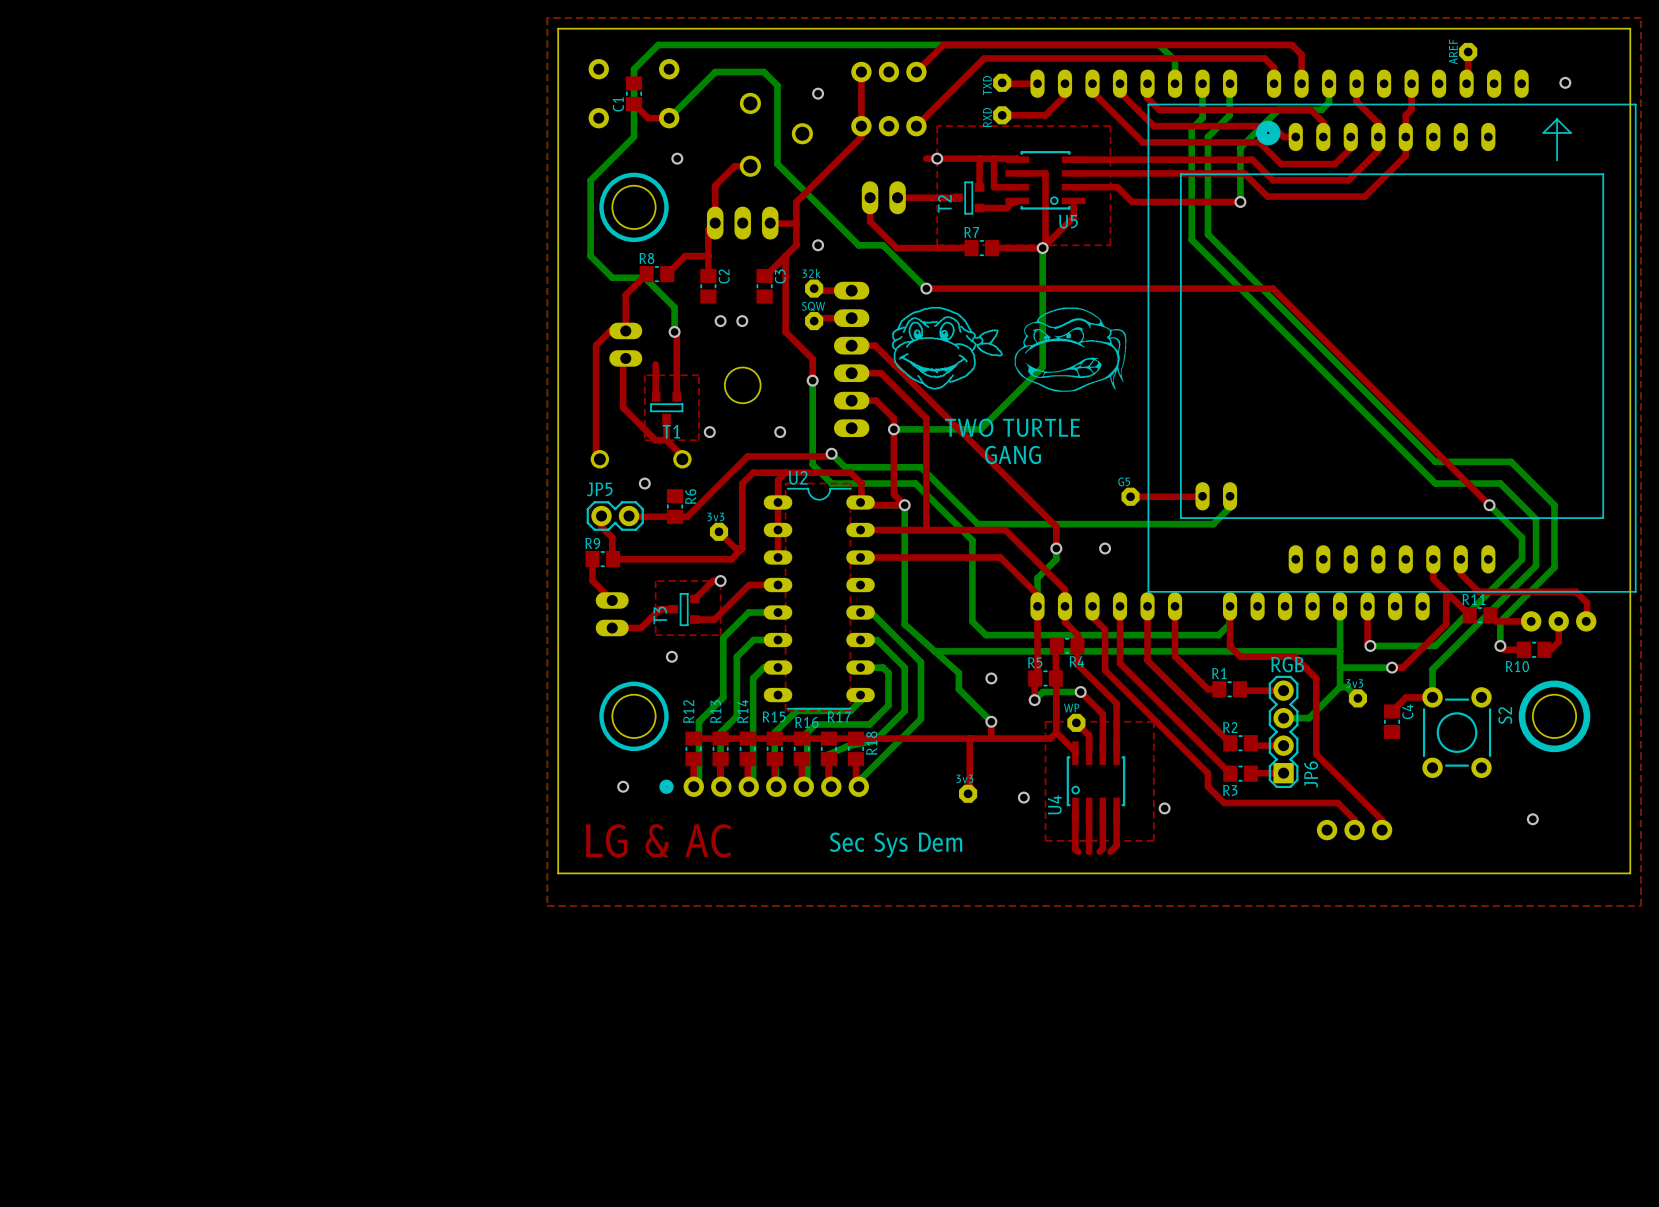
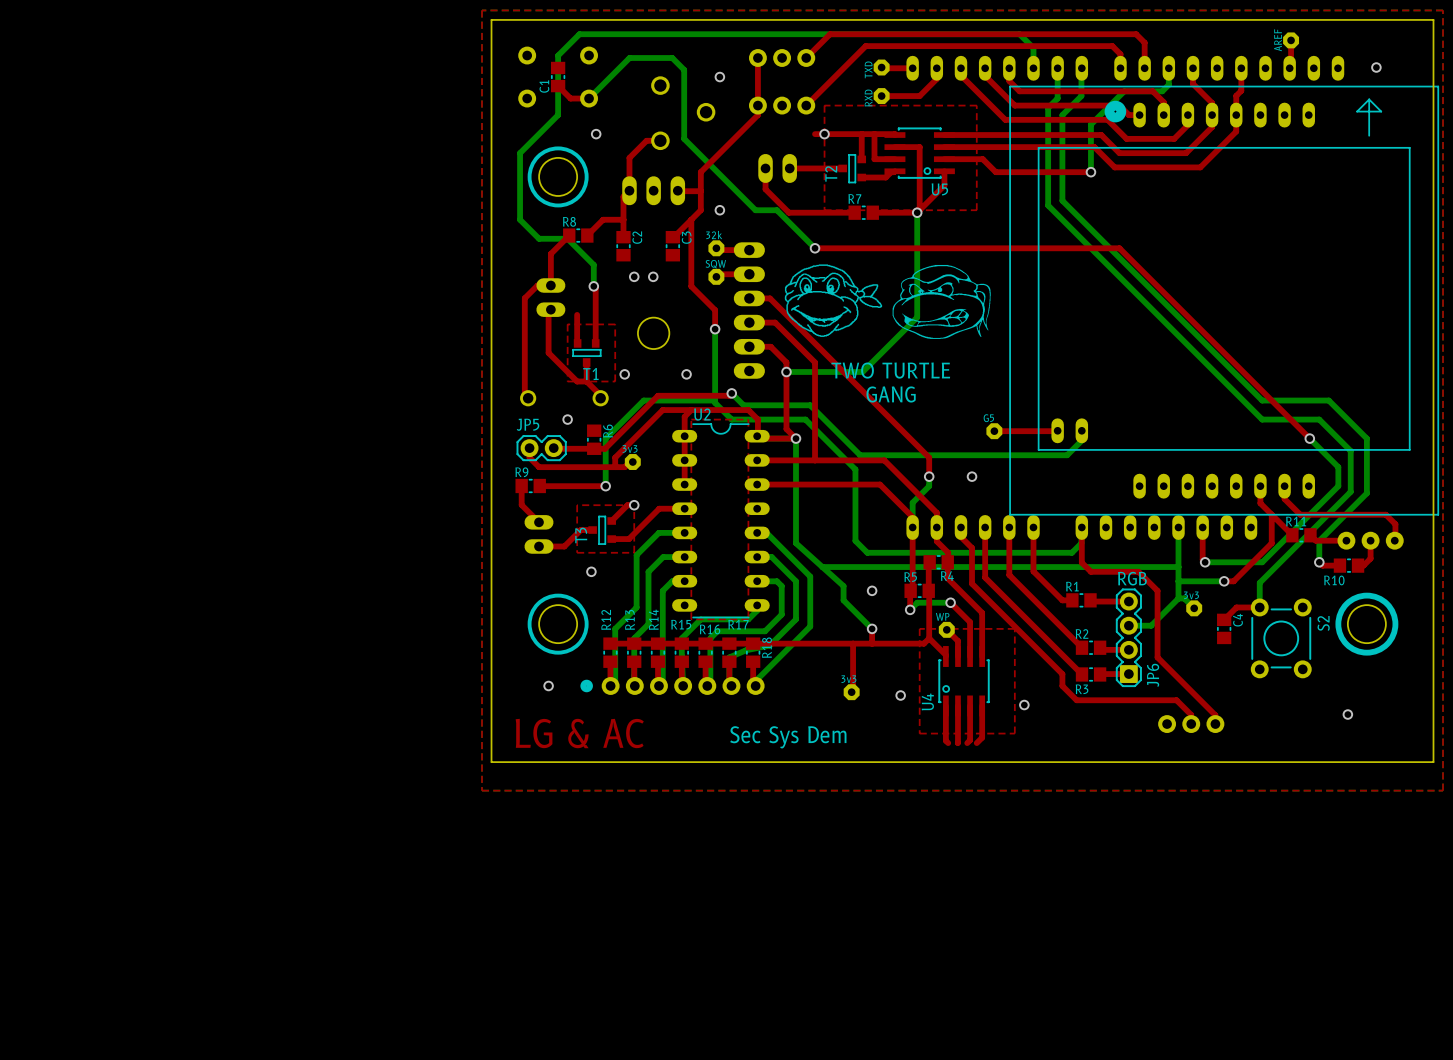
bottom track: none -> (715, 400) (643, 400) (605, 438) (605, 486)
top track: (742, 483) (742, 548) -> (653, 419) (615, 457) (615, 467)
top track: (719, 531) (735, 548) (742, 548) -> none
top track: (612, 537) (613, 559) -> (539, 467) (624, 467) (629, 462) (632, 462)
top track: (742, 548) (731, 559) (688, 559) -> none
via: none -> (605, 486)

